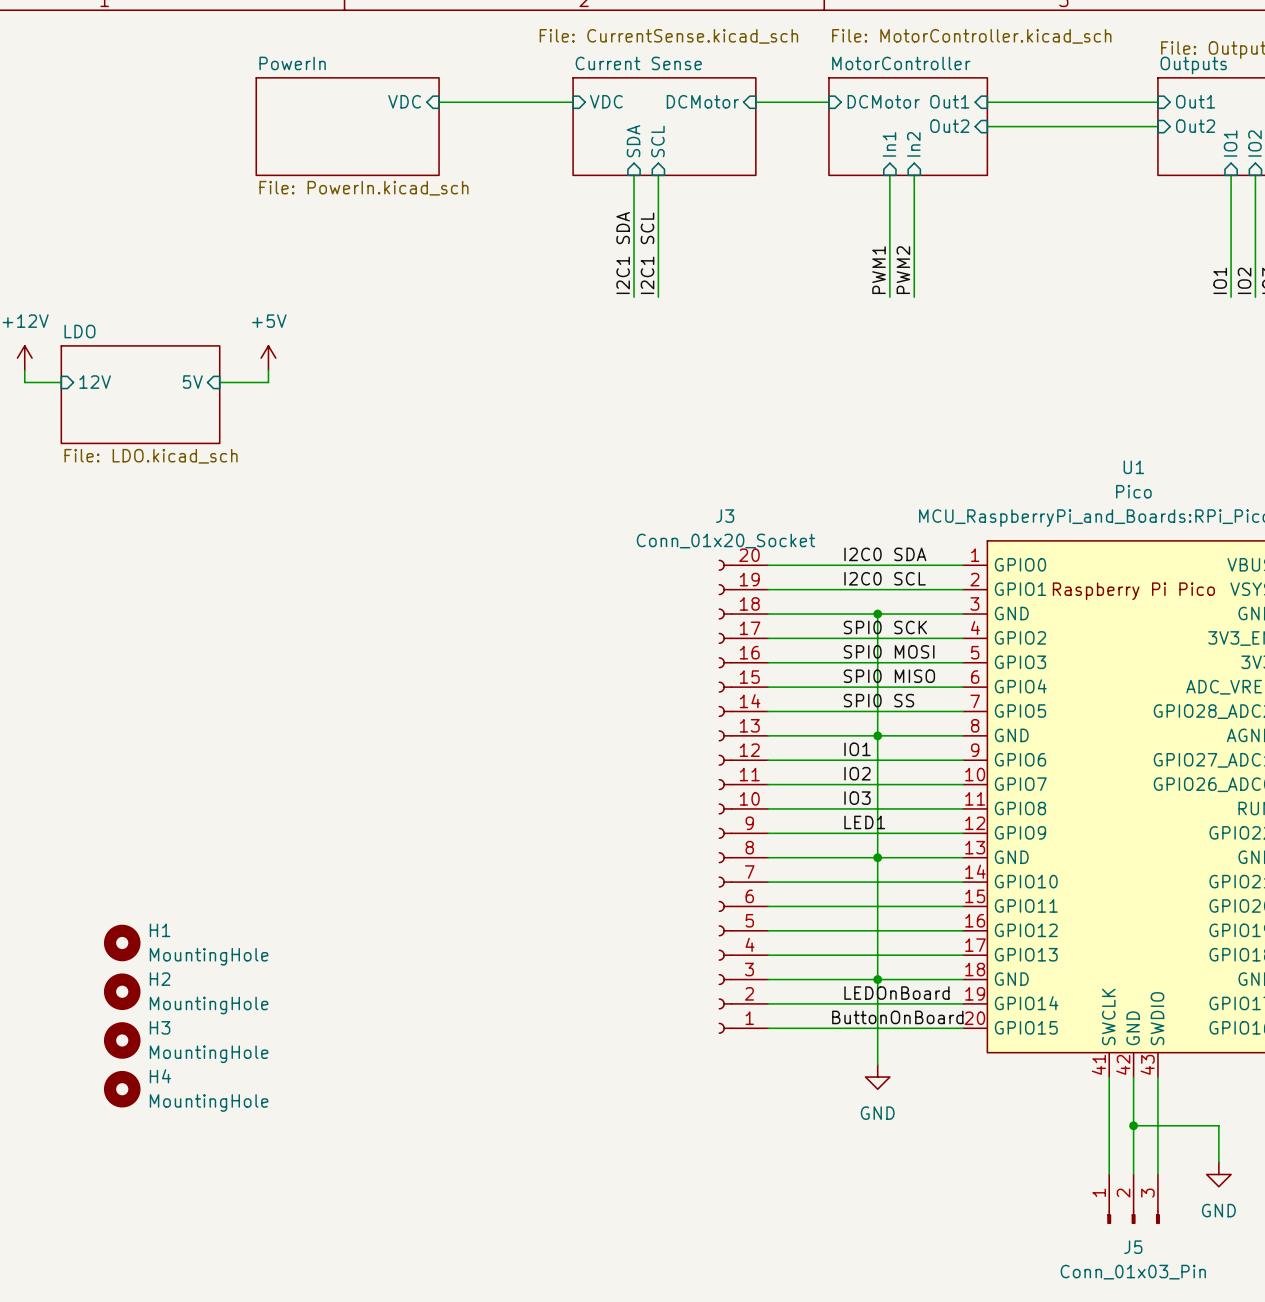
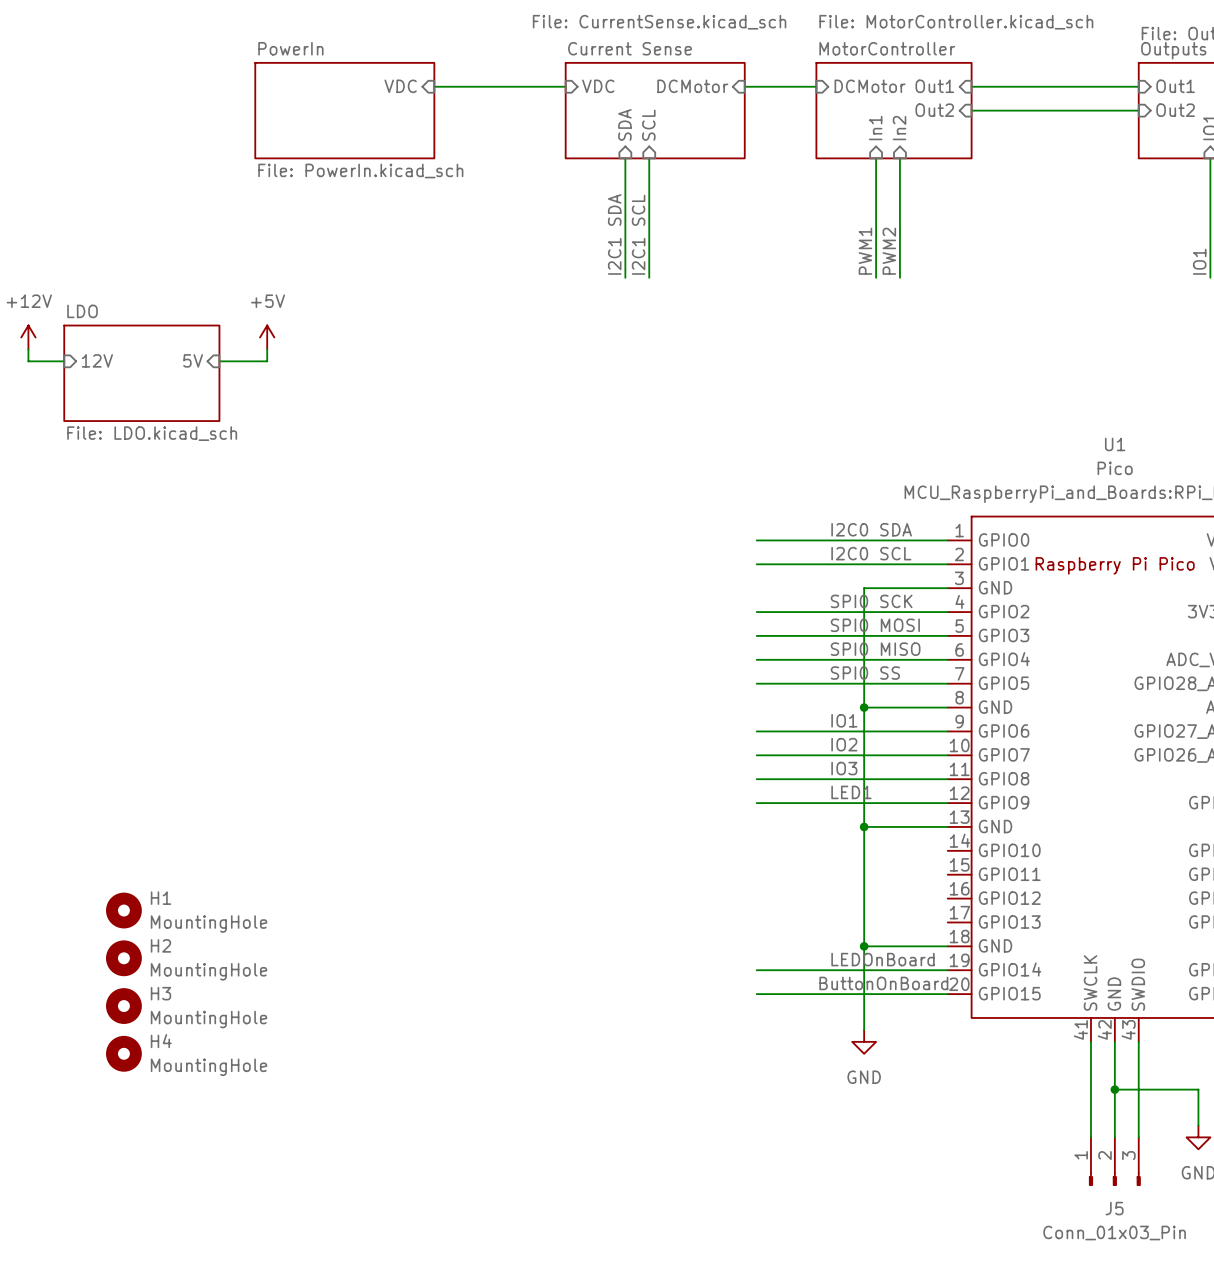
wire: (768, 614) (877, 614) -> none
junction: (877, 614) -> none
wire: (768, 735) (877, 735) -> none
J3: Conn_01x20_Socket (743, 796) -> none
wire: (768, 857) (877, 857) -> none
wire: (768, 882) (963, 882) -> none
wire: (768, 906) (963, 906) -> none
wire: (768, 930) (963, 930) -> none
wire: (768, 955) (963, 955) -> none
wire: (768, 979) (877, 979) -> none

